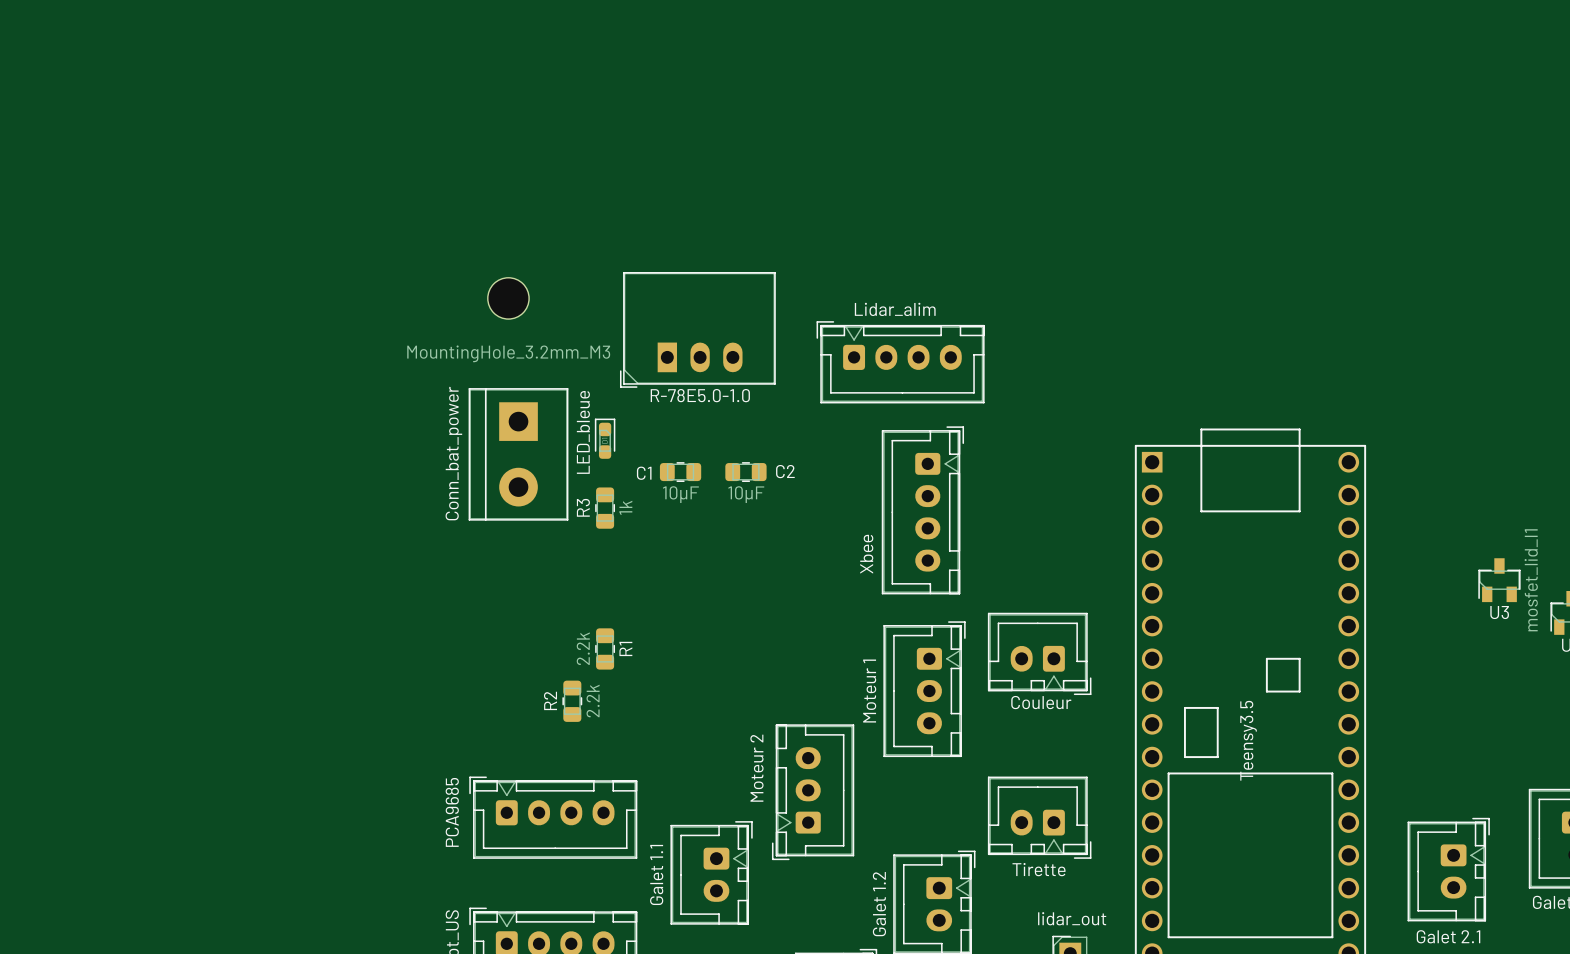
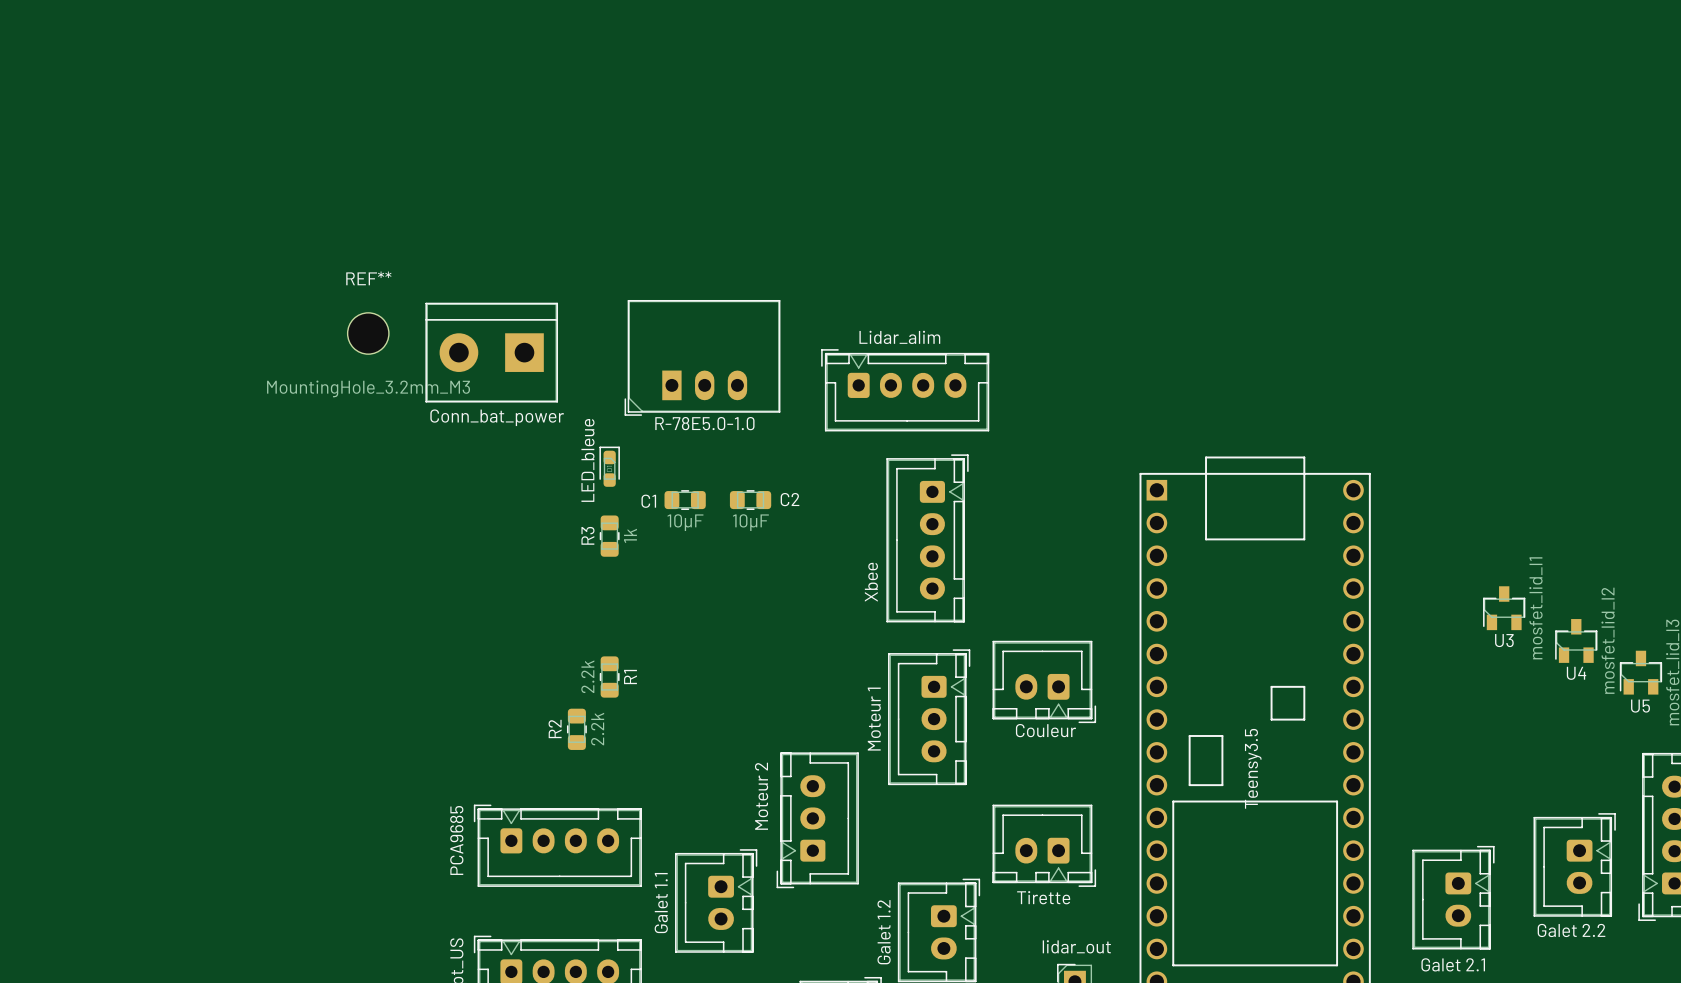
part: MountingHole_3.2mm_M3 (508, 298) -> none
REF**: none -> MountingHole_3.2mm_M3 (368, 333)
part value position: Conn_bat_power (453, 453) -> Conn_bat_power (497, 417)
part rotation: 0° (518, 454) -> 90° clockwise (491, 352)
part position: (518, 454) -> (491, 352)

